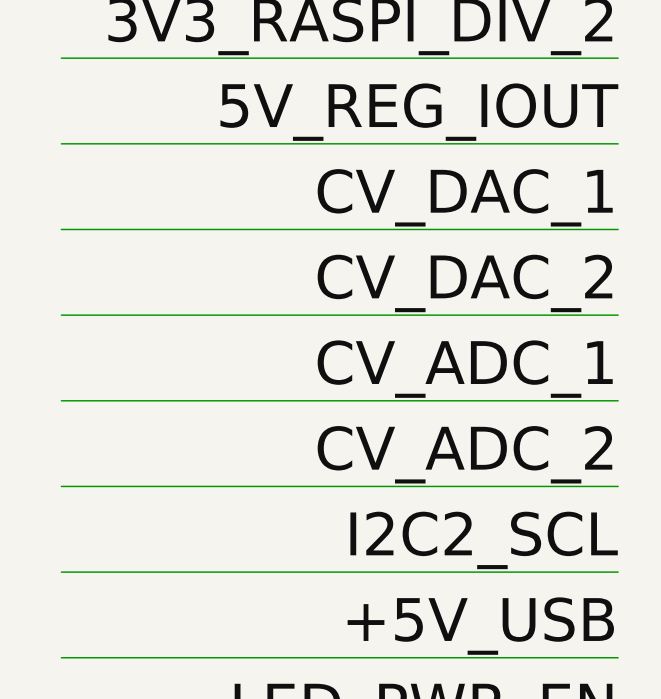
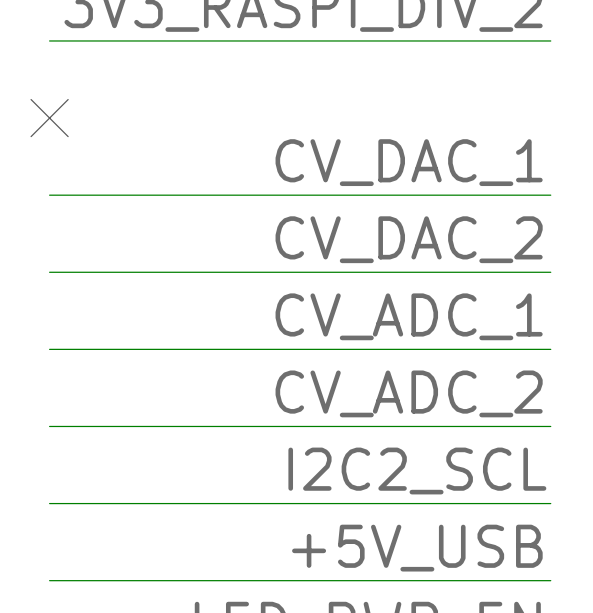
label: 5V_REG_IOUT (419, 112) -> none
wire: (61, 143) (618, 143) -> none
no-connect mark: none -> (49, 118)

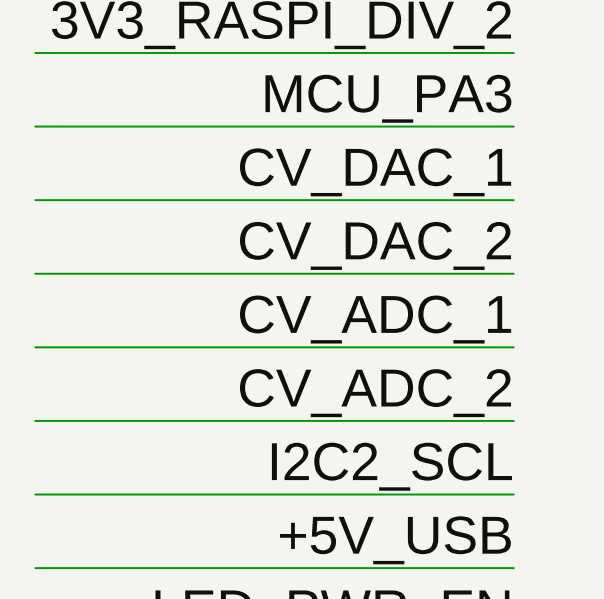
label: none -> MCU_PA3 (388, 98)
wire: none -> (35, 126) (513, 126)
no-connect mark: (49, 118) -> none

